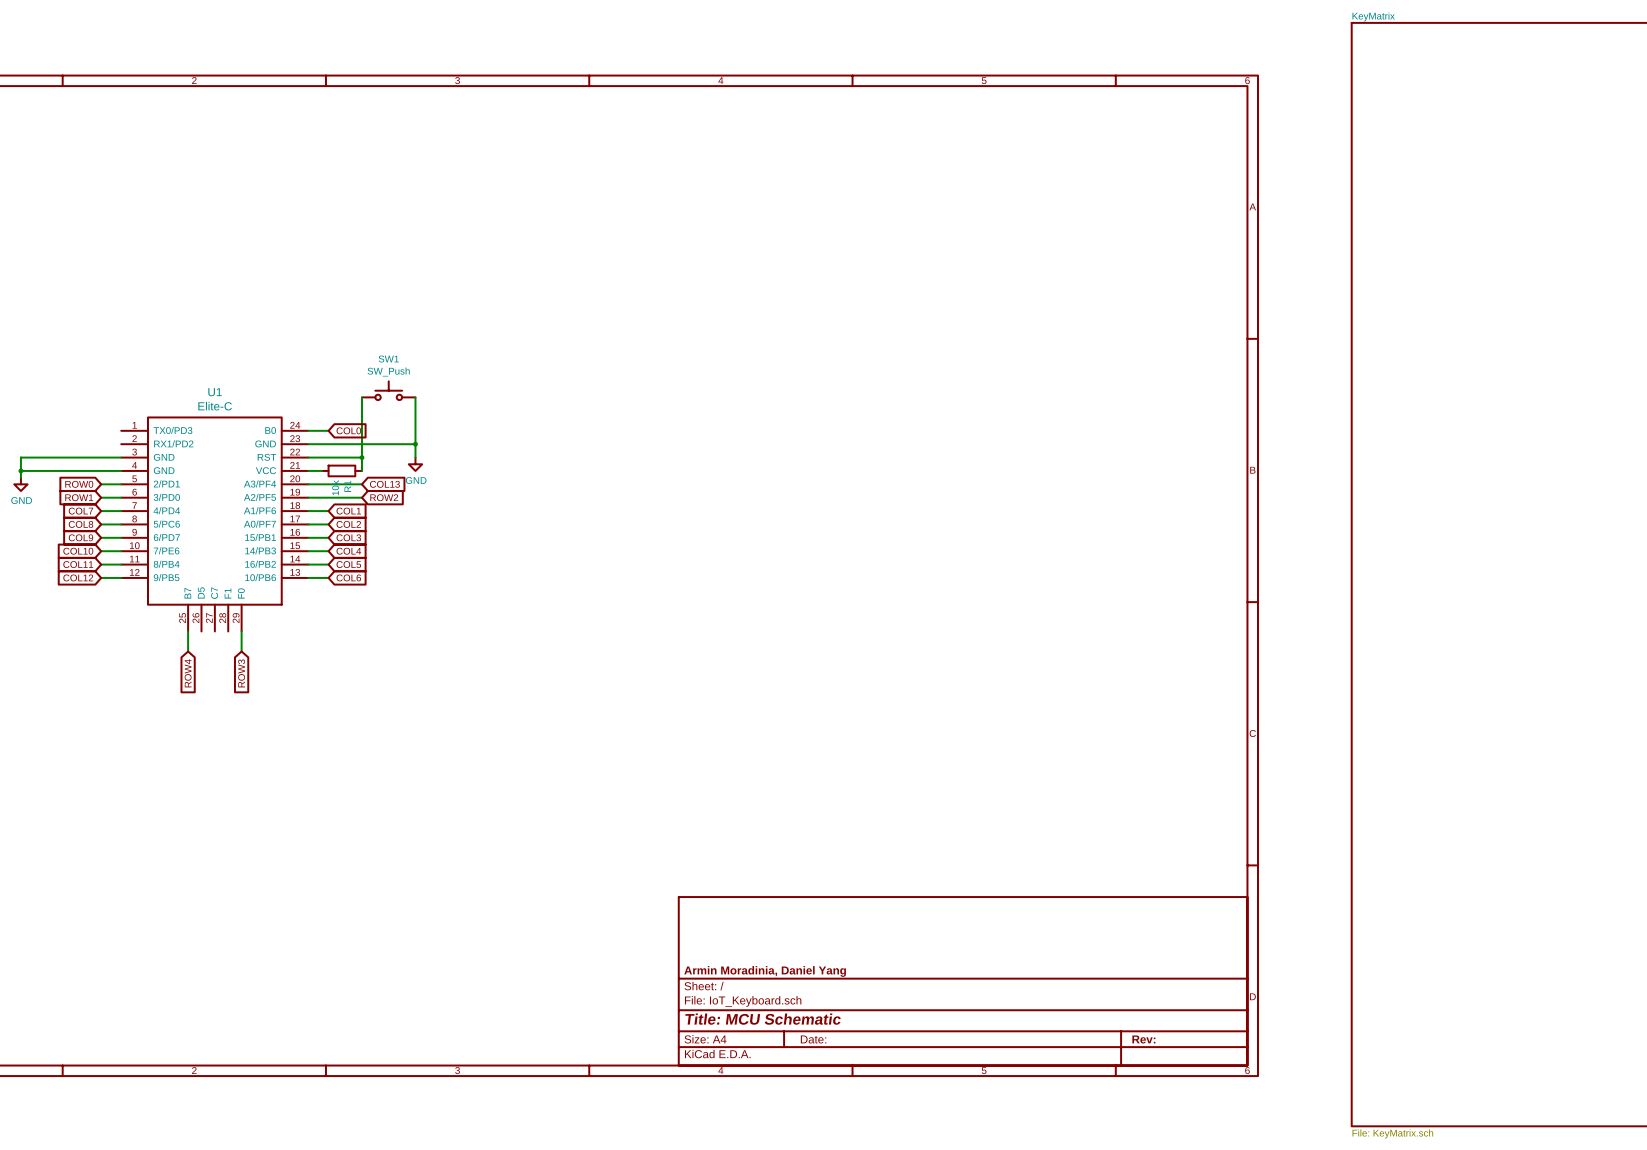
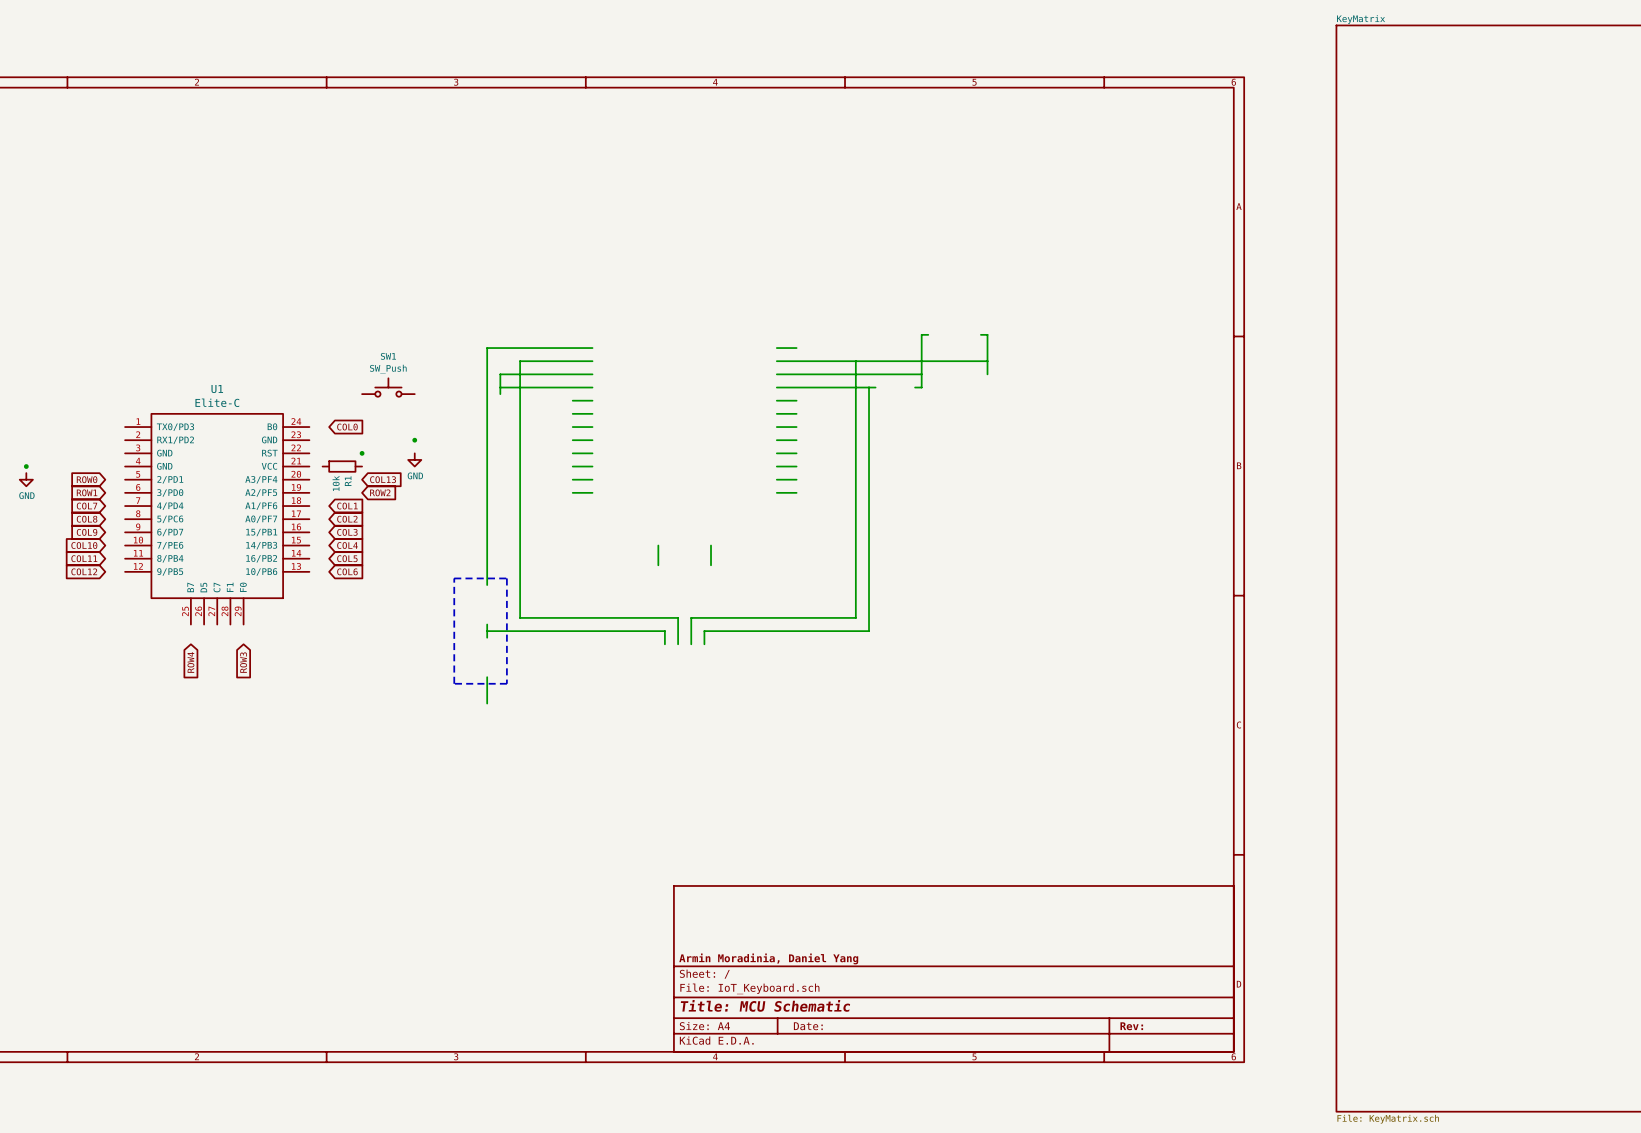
wire: none -> (928, 334) (921, 334) (921, 387) (915, 387)
wire: none -> (980, 334) (987, 334) (987, 374)
wire: none -> (592, 348) (487, 348) (487, 585)
wire: none -> (776, 348) (796, 348)
wire: none -> (592, 361) (520, 361) (520, 617) (678, 617) (678, 644)
wire: none -> (776, 361) (987, 361)
wire: none -> (855, 361) (855, 617) (691, 617) (691, 644)
wire: none -> (592, 374) (500, 374) (500, 394)
wire: none -> (776, 374) (921, 374)
wire: none -> (500, 387) (592, 387)
wire: none -> (776, 387) (875, 387)
wire: none -> (869, 387) (869, 631) (704, 631) (704, 644)
wire: (361, 397) (361, 470) -> none
wire: (415, 397) (415, 457) -> none
wire: none -> (572, 400) (592, 400)
wire: none -> (776, 400) (796, 400)
wire: none -> (572, 413) (592, 413)
wire: none -> (776, 413) (796, 413)
wire: (308, 430) (328, 430) -> none
wire: none -> (572, 427) (592, 427)
wire: none -> (776, 427) (796, 427)
wire: (308, 444) (415, 444) -> none
wire: none -> (572, 440) (592, 440)
wire: none -> (776, 440) (796, 440)
wire: (121, 457) (20, 457) (20, 477) -> none
wire: (308, 457) (361, 457) -> none
wire: none -> (572, 453) (592, 453)
wire: none -> (776, 453) (796, 453)
wire: (20, 470) (121, 470) -> none
wire: (308, 470) (321, 470) -> none
wire: none -> (572, 466) (592, 466)
wire: none -> (776, 466) (796, 466)
wire: (101, 484) (121, 484) -> none
wire: (308, 484) (361, 484) -> none
wire: none -> (572, 479) (592, 479)
wire: none -> (776, 479) (796, 479)
wire: (101, 497) (121, 497) -> none
wire: (308, 497) (361, 497) -> none
wire: none -> (572, 492) (592, 492)
wire: none -> (776, 492) (796, 492)
wire: (101, 511) (121, 511) -> none
wire: (308, 511) (328, 511) -> none
wire: (101, 524) (121, 524) -> none
wire: (308, 524) (328, 524) -> none
wire: (101, 537) (121, 537) -> none
wire: (308, 537) (328, 537) -> none
wire: (101, 551) (121, 551) -> none
wire: (308, 551) (328, 551) -> none
wire: none -> (658, 545) (658, 565)
wire: none -> (711, 545) (711, 565)
wire: (101, 564) (121, 564) -> none
wire: (308, 564) (328, 564) -> none
wire: (101, 577) (121, 577) -> none
wire: (308, 577) (328, 577) -> none
line: none -> (454, 578) (506, 578) (506, 683) (454, 683) (454, 578)
wire: (188, 631) (188, 651) -> none
wire: (241, 631) (241, 651) -> none
wire: none -> (487, 624) (487, 637)
wire: none -> (487, 631) (664, 631) (664, 644)
wire: none -> (487, 677) (487, 703)

